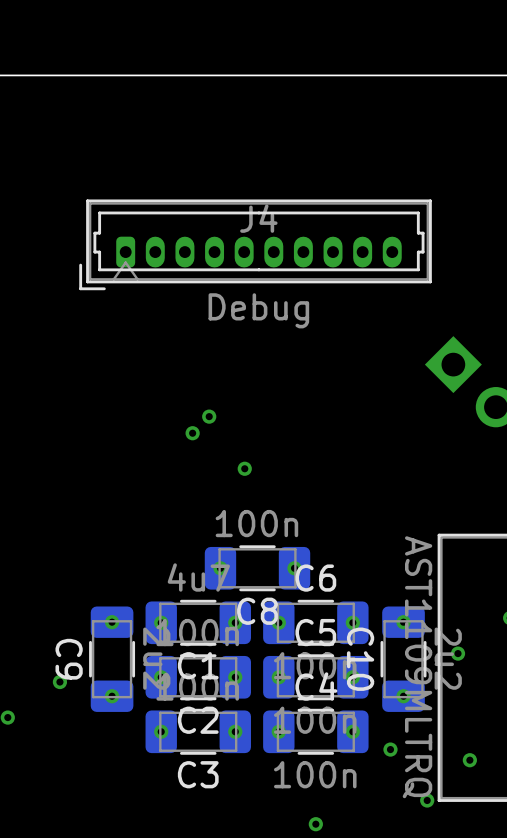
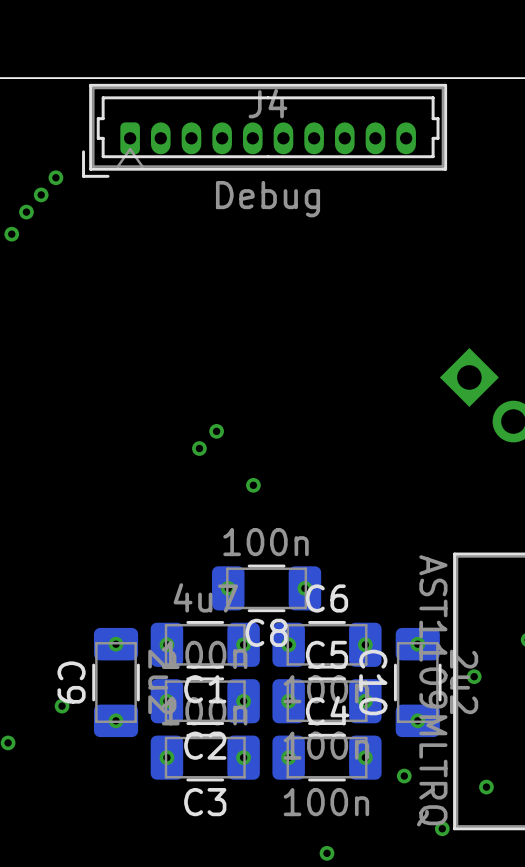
via: none -> (55, 177)
via: none -> (41, 194)
via: none -> (26, 212)
via: none -> (11, 234)
J4 position: (255, 244) -> (264, 130)

